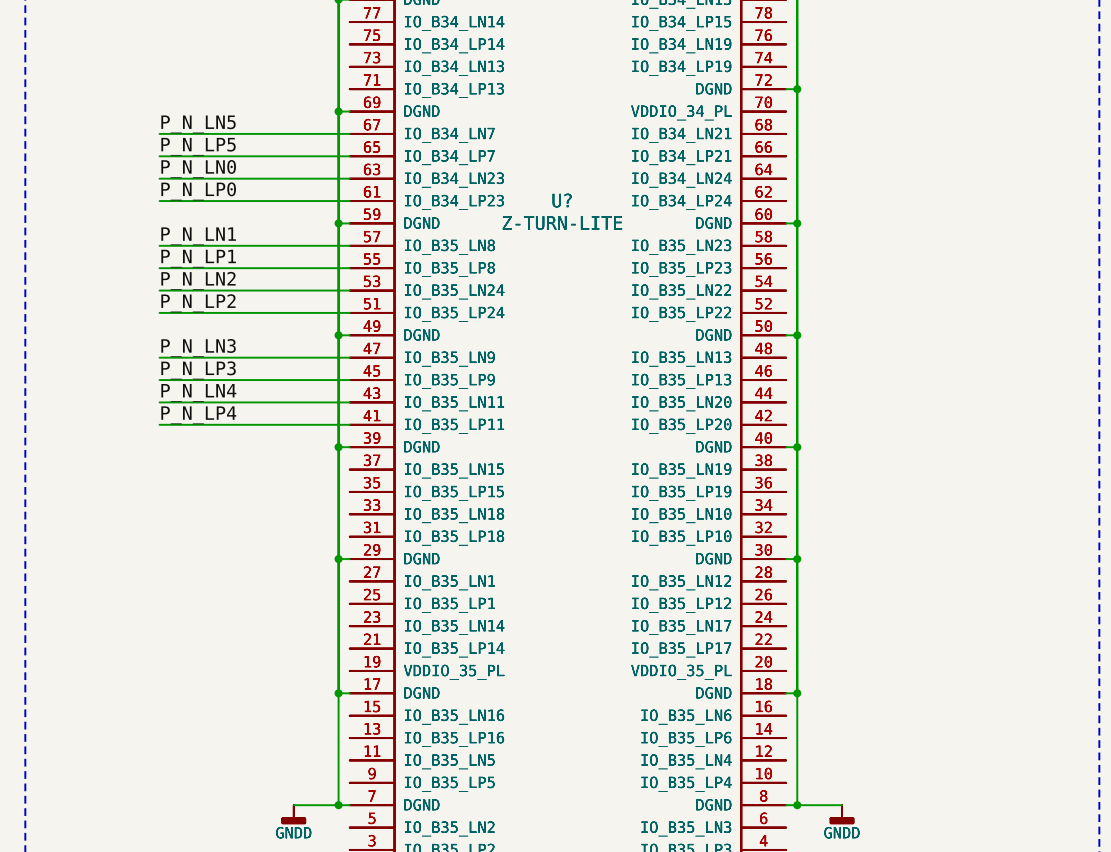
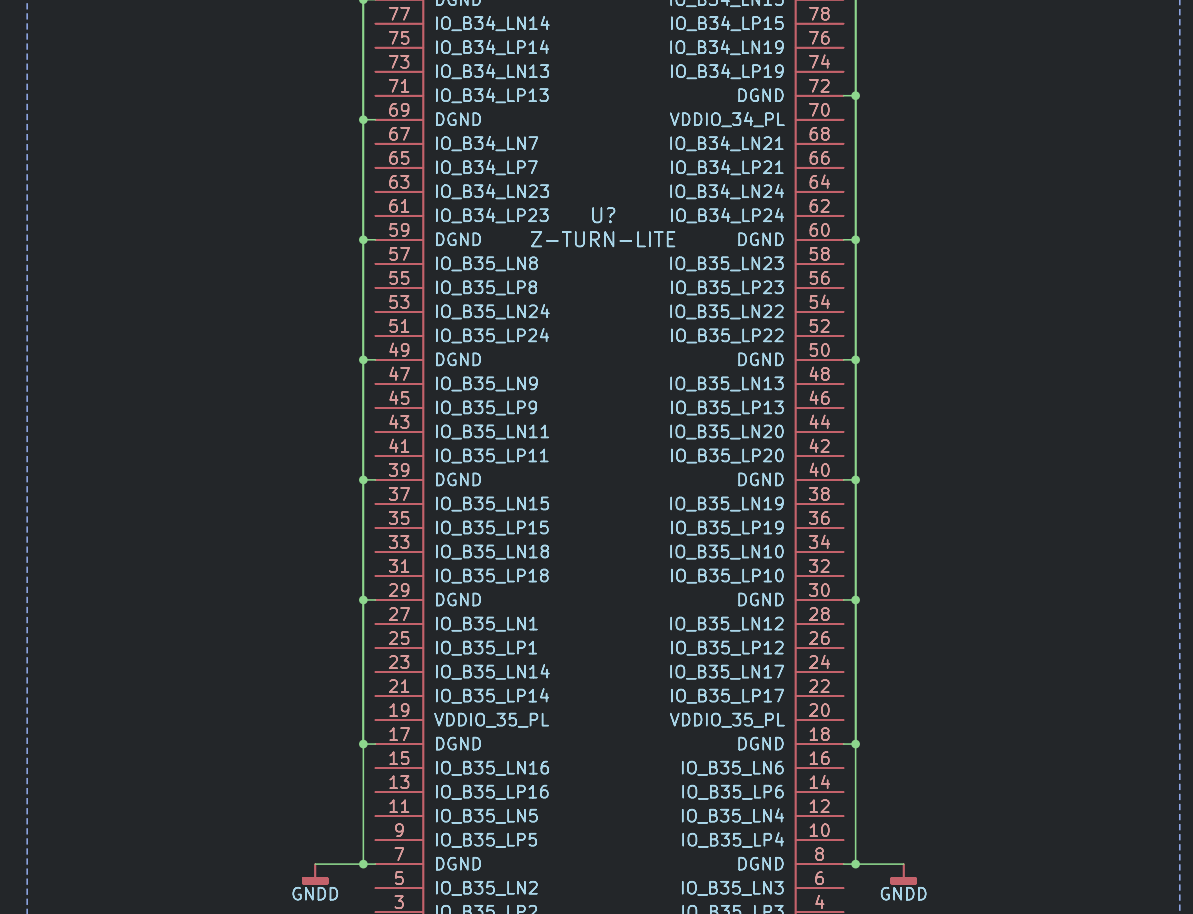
label: P_N_LN5 (198, 124) -> none
wire: (159, 133) (349, 133) -> none
label: P_N_LP5 (198, 146) -> none
wire: (159, 156) (349, 156) -> none
label: P_N_LN0 (198, 169) -> none
wire: (159, 178) (349, 178) -> none
label: P_N_LP0 (198, 191) -> none
wire: (159, 201) (349, 201) -> none
label: P_N_LN1 (198, 236) -> none
wire: (159, 245) (349, 245) -> none
label: P_N_LP1 (198, 258) -> none
wire: (159, 268) (349, 268) -> none
label: P_N_LN2 (198, 280) -> none
wire: (159, 290) (349, 290) -> none
label: P_N_LP2 (198, 303) -> none
wire: (159, 312) (349, 312) -> none
label: P_N_LN3 (198, 348) -> none
wire: (159, 357) (349, 357) -> none
label: P_N_LP3 (198, 370) -> none
wire: (159, 380) (349, 380) -> none
label: P_N_LN4 (198, 392) -> none
wire: (159, 402) (349, 402) -> none
label: P_N_LP4 (198, 415) -> none
wire: (159, 424) (349, 424) -> none

